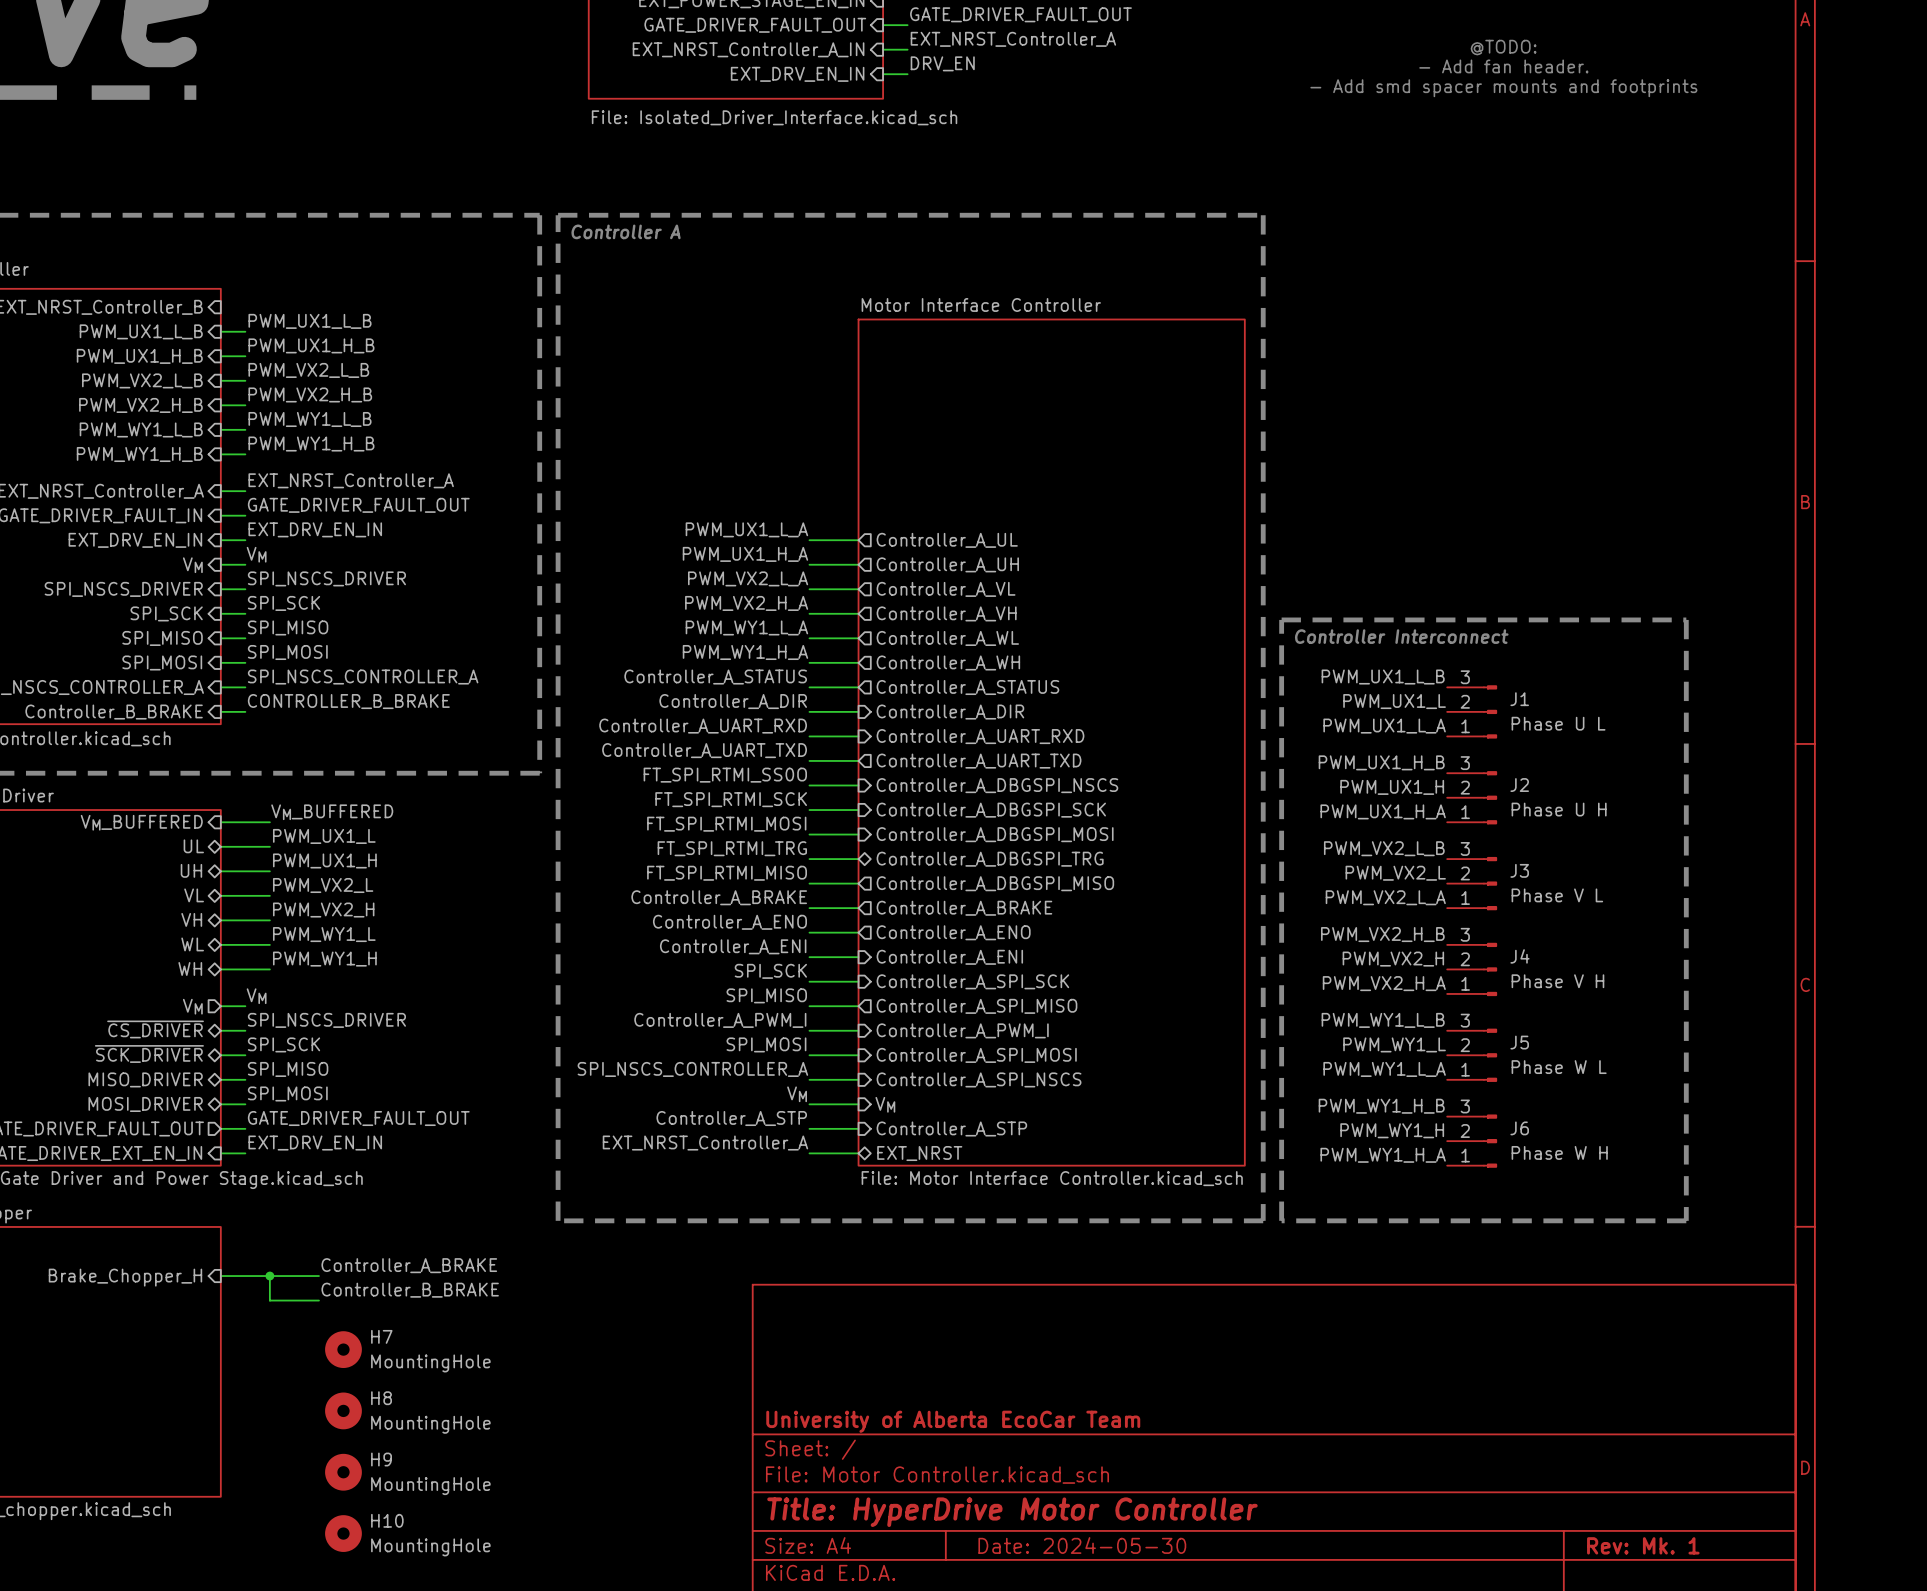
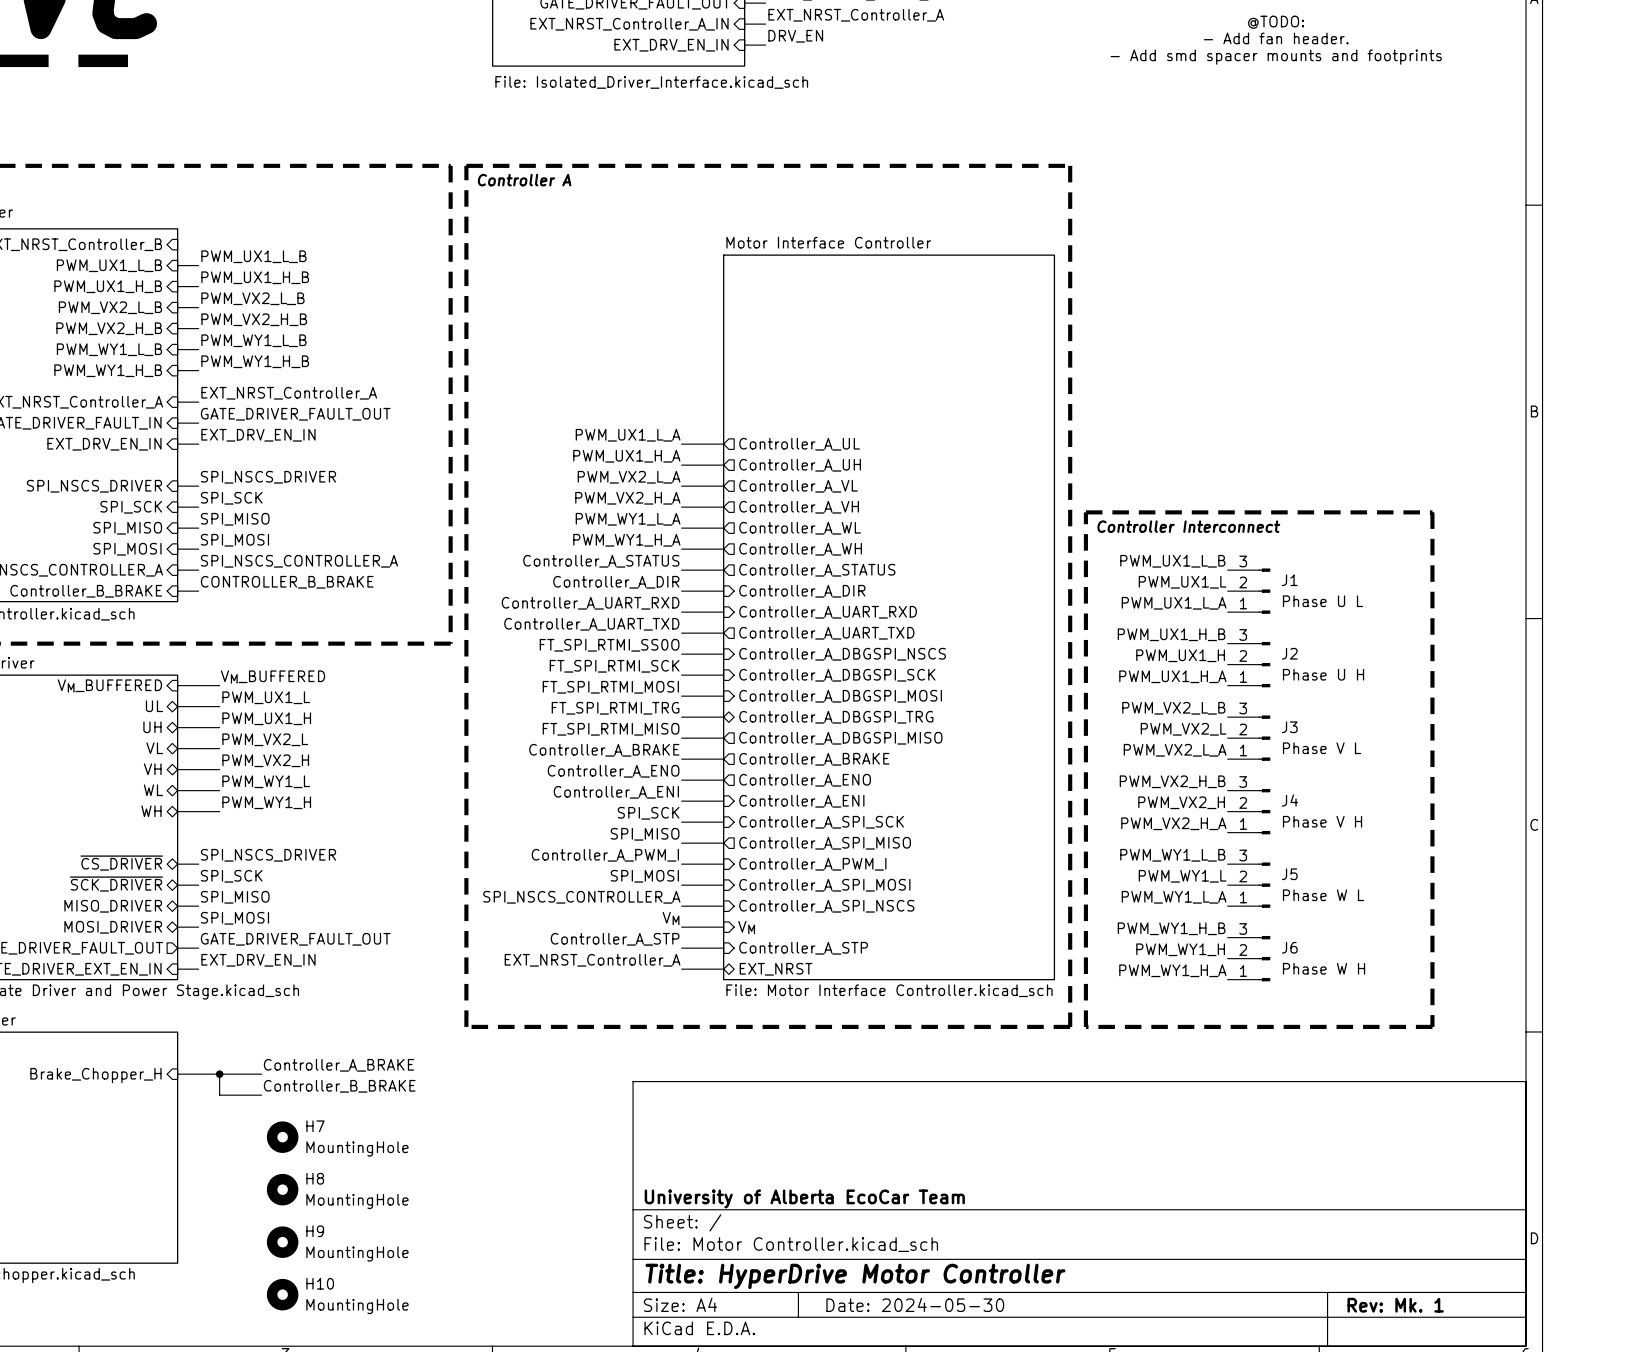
label: VM (256, 554) -> none
wire: (220, 564) (245, 564) -> none
sheet pin: VM (192, 565) -> none
label: VM (256, 996) -> none
sheet pin: VM (192, 1006) -> none
wire: (220, 1006) (245, 1006) -> none

